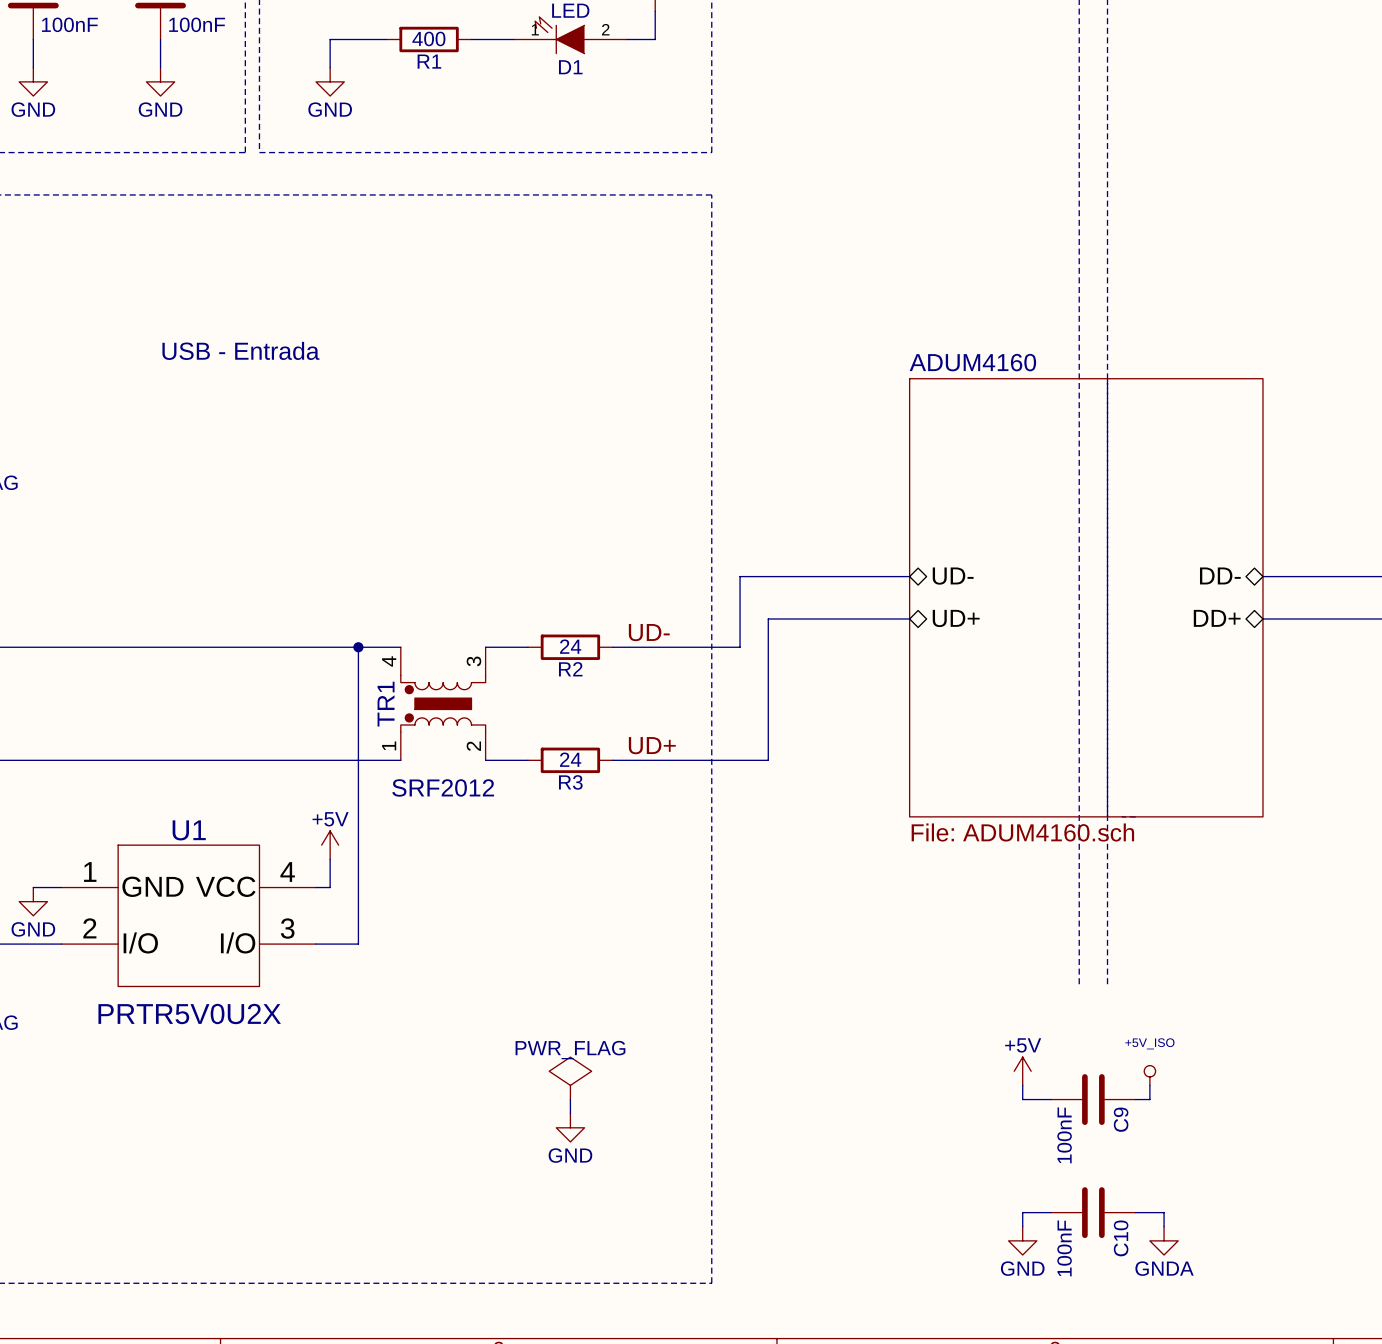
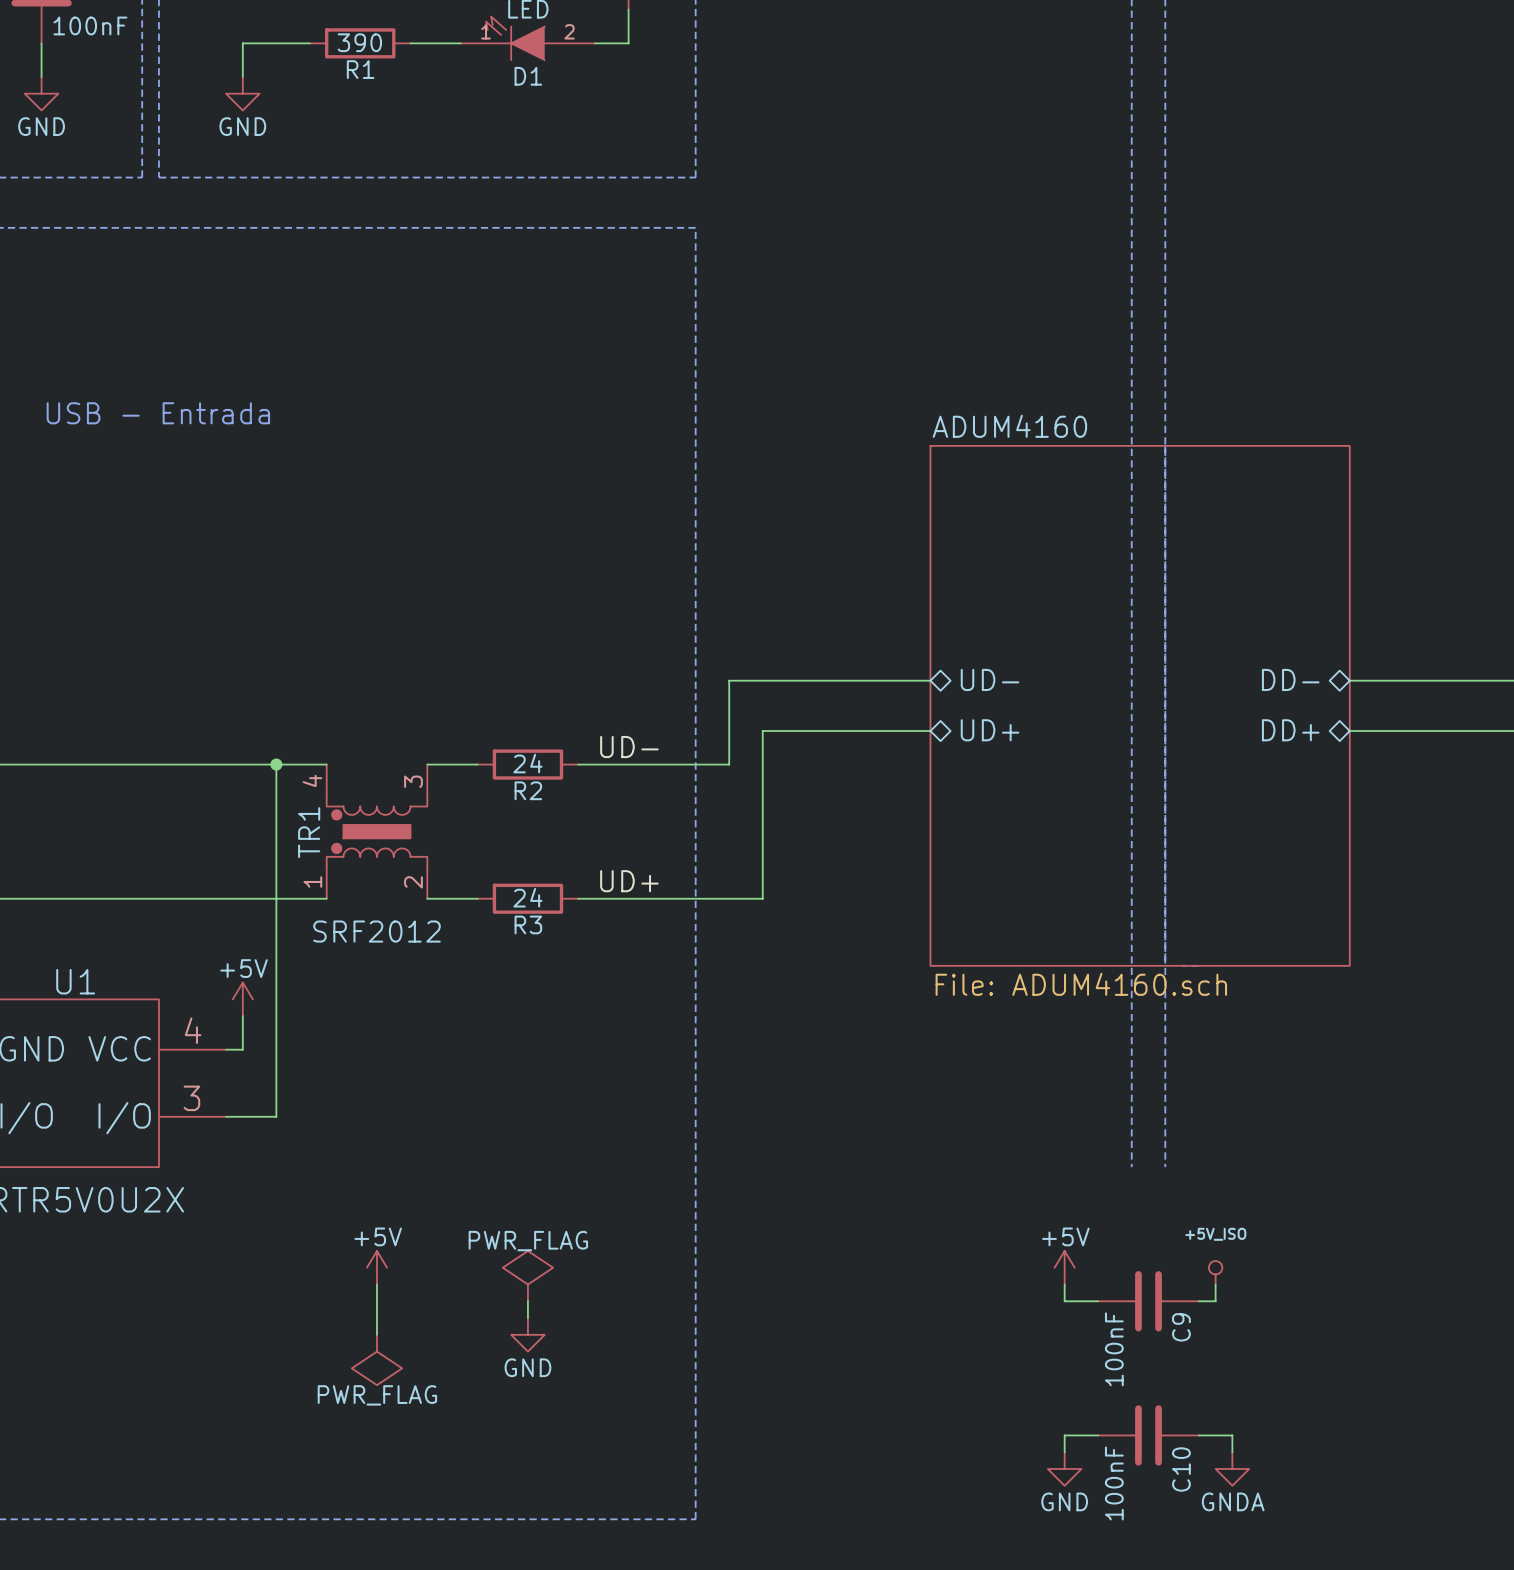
R1 value: 400 (428, 38) -> 390 (359, 42)
power symbol: none -> +5V (377, 1267)
wire: none -> (377, 1284) (377, 1334)
power symbol: none -> PWR_FLAG (377, 1359)

